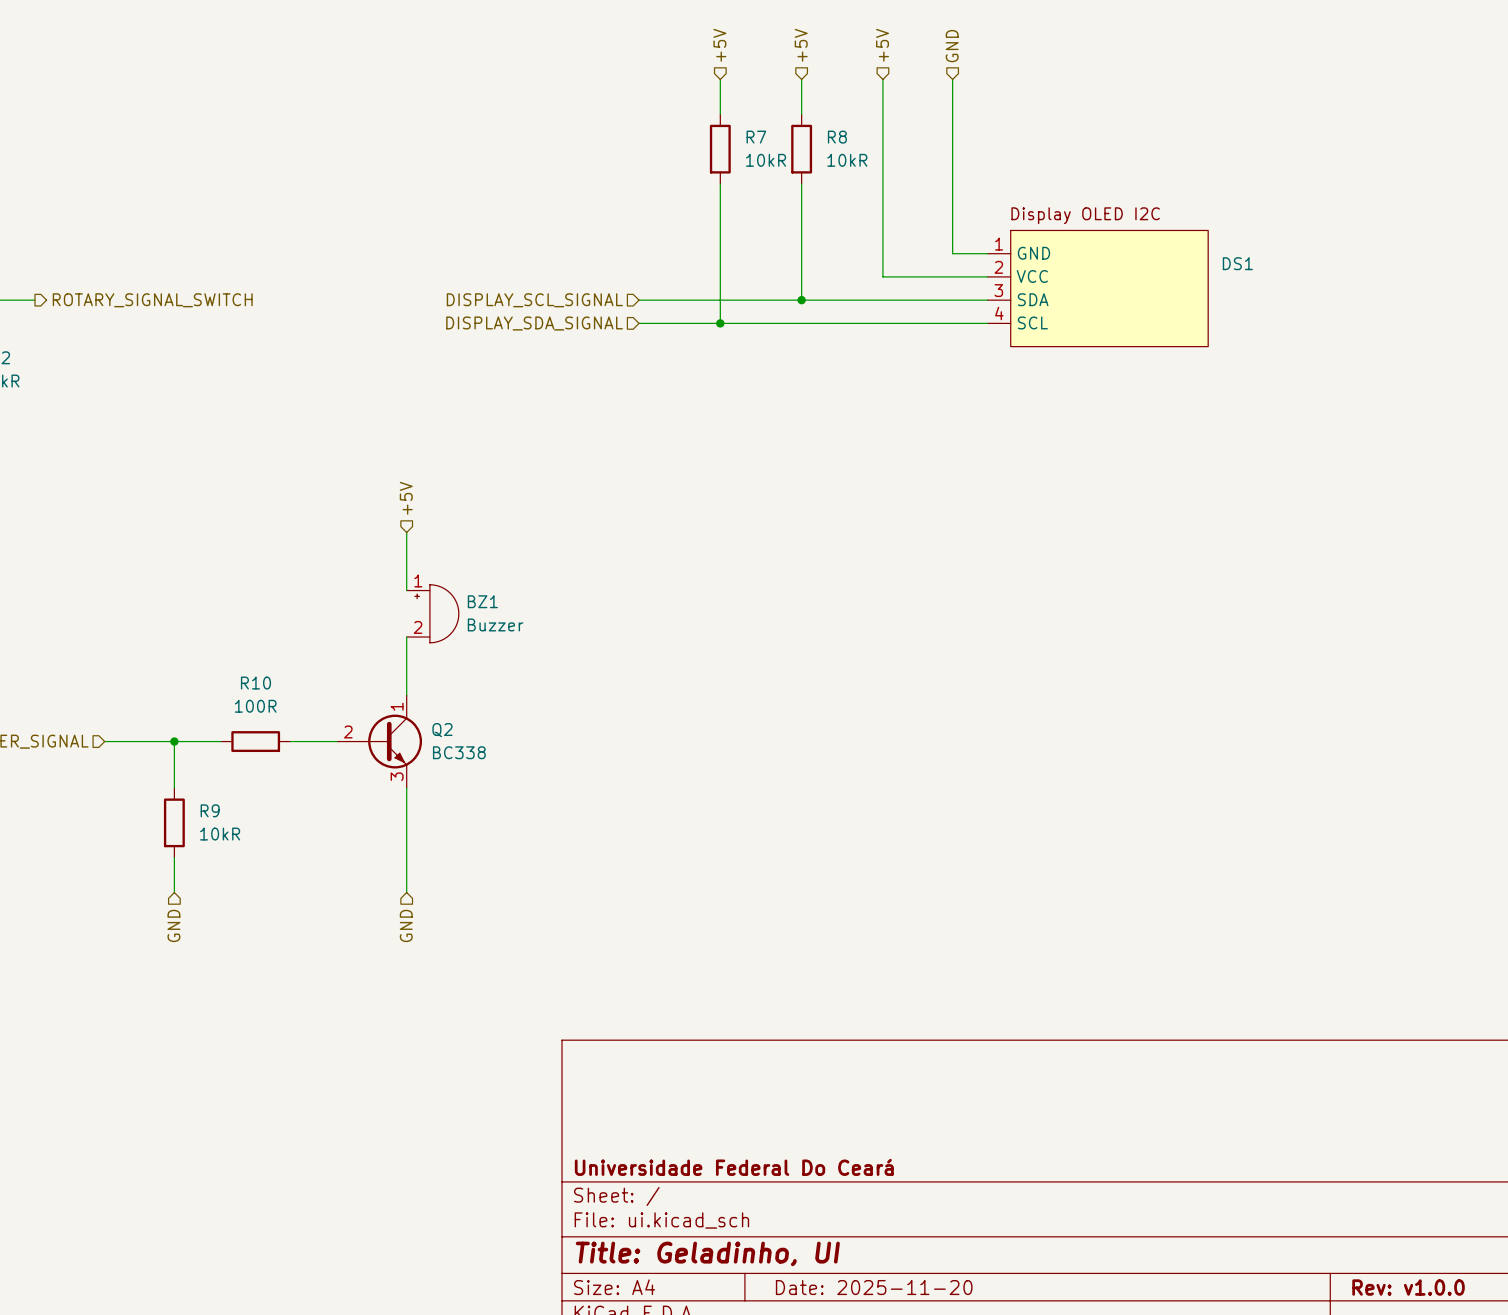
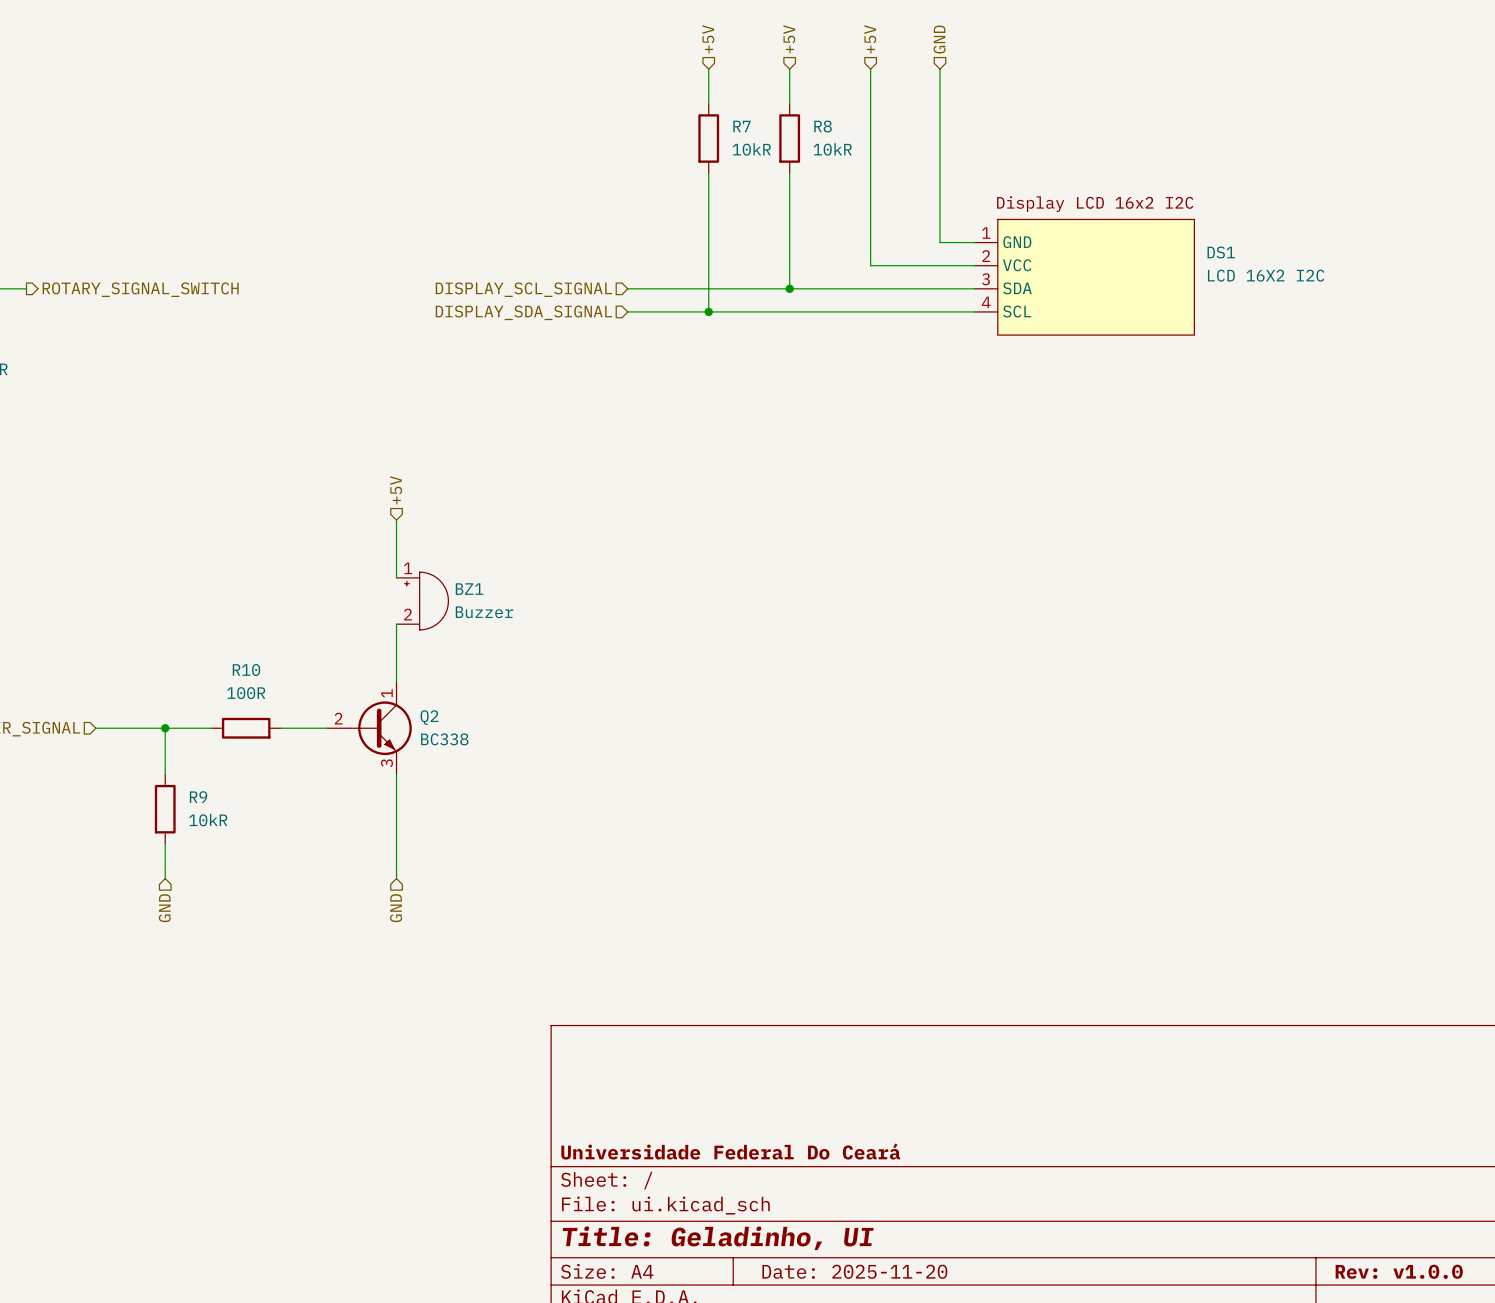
DS1 text: Display OLED I2C (1085, 215) -> Display LCD 16x2 I2C (1095, 204)
DS1 value: none -> LCD 16X2 I2C (1266, 275)

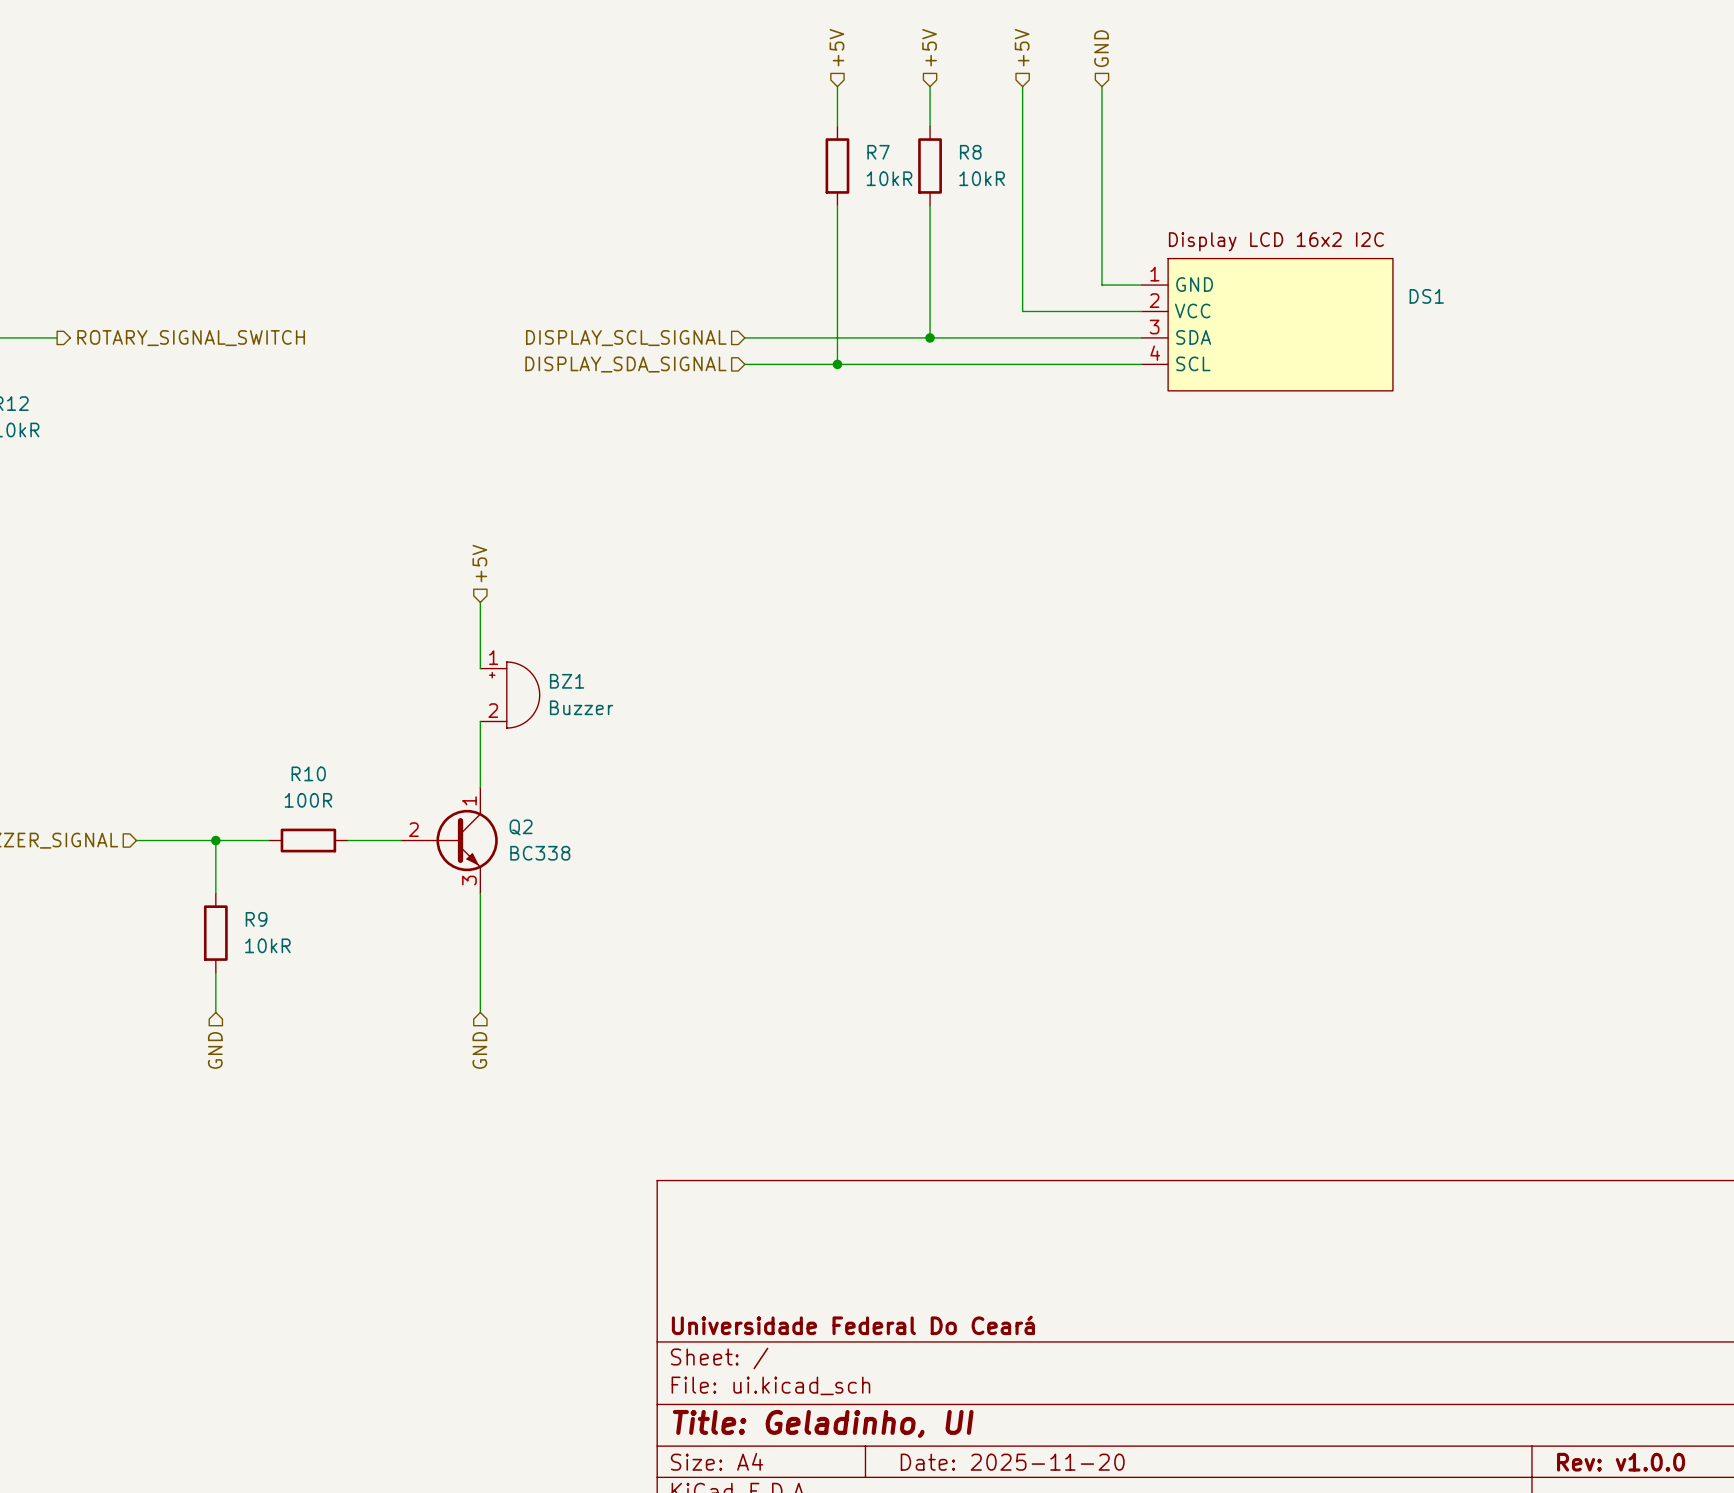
DS1 value: LCD 16X2 I2C (1266, 275) -> none

